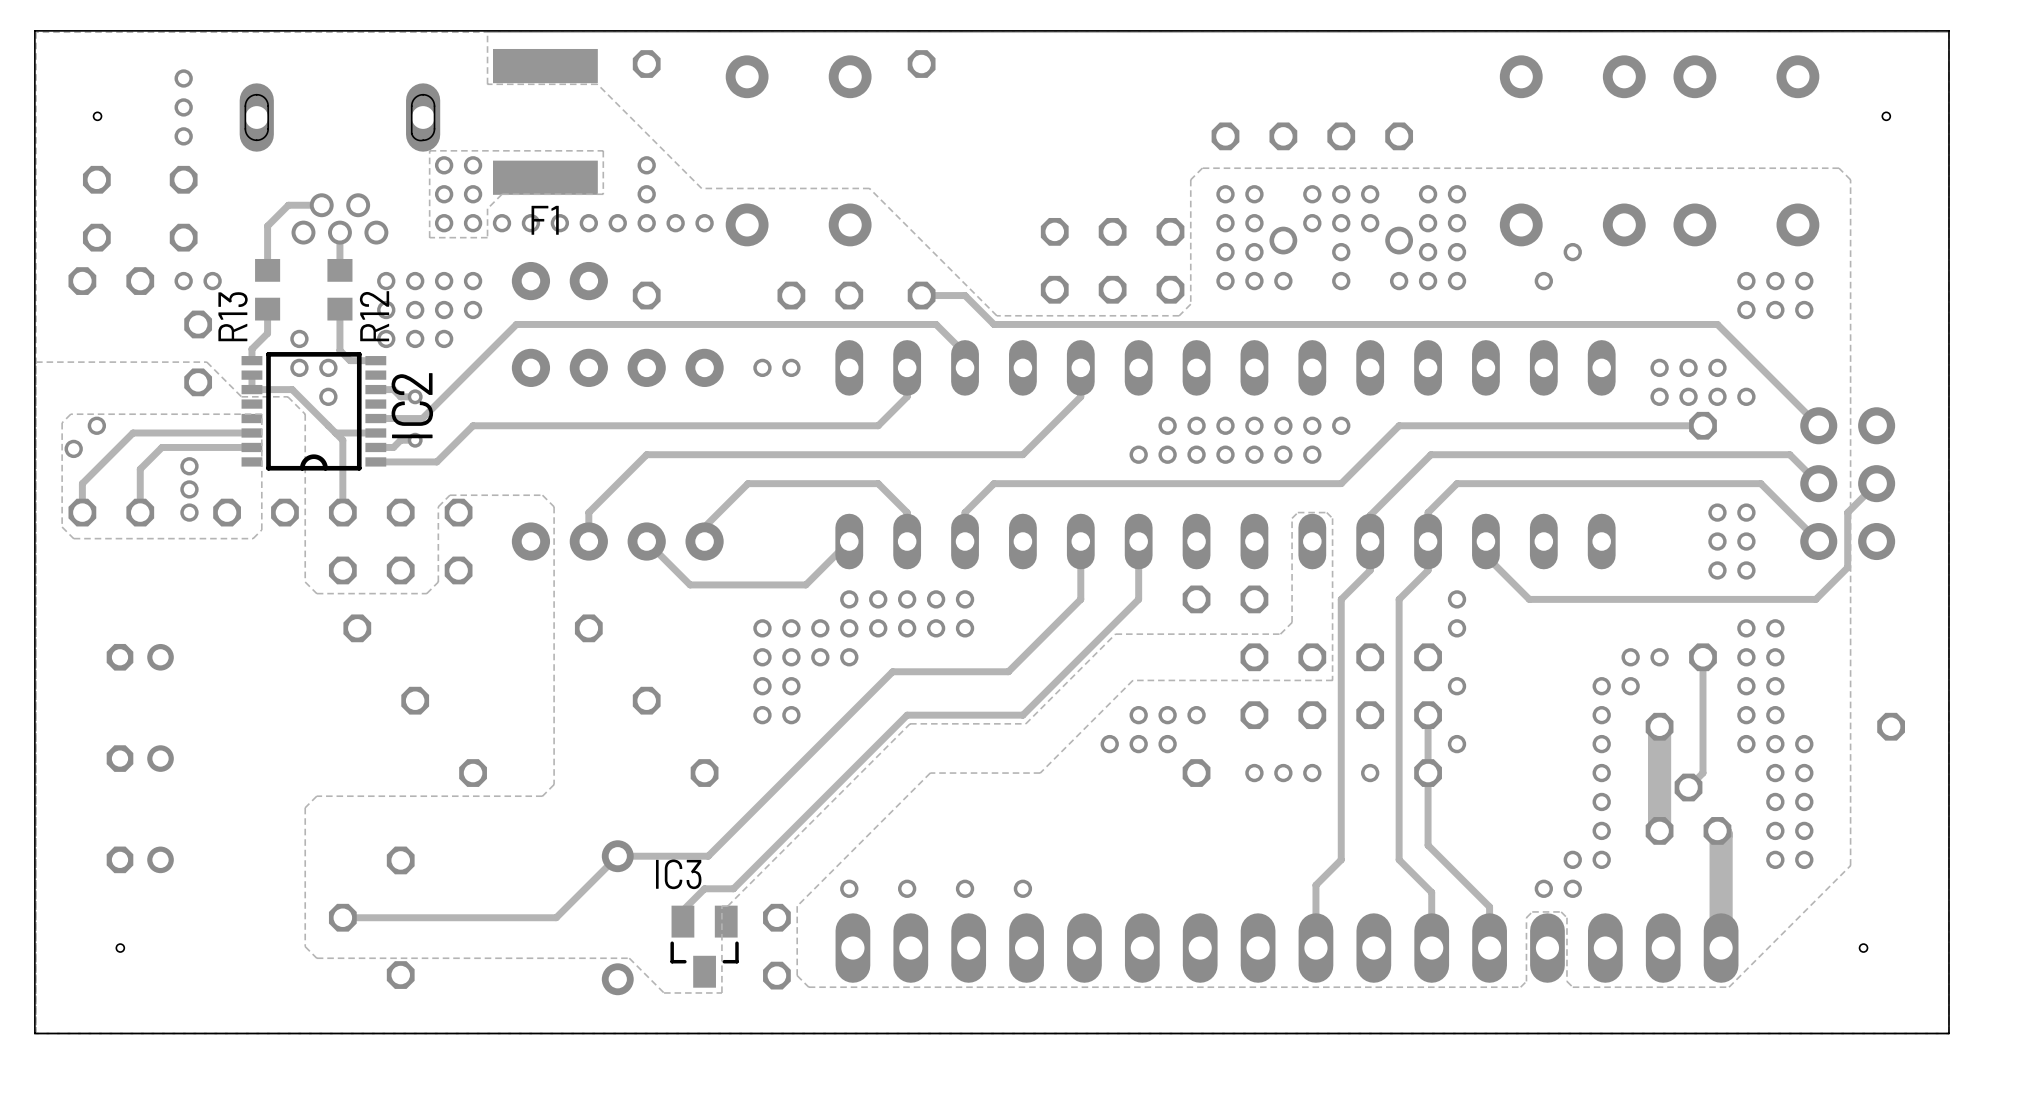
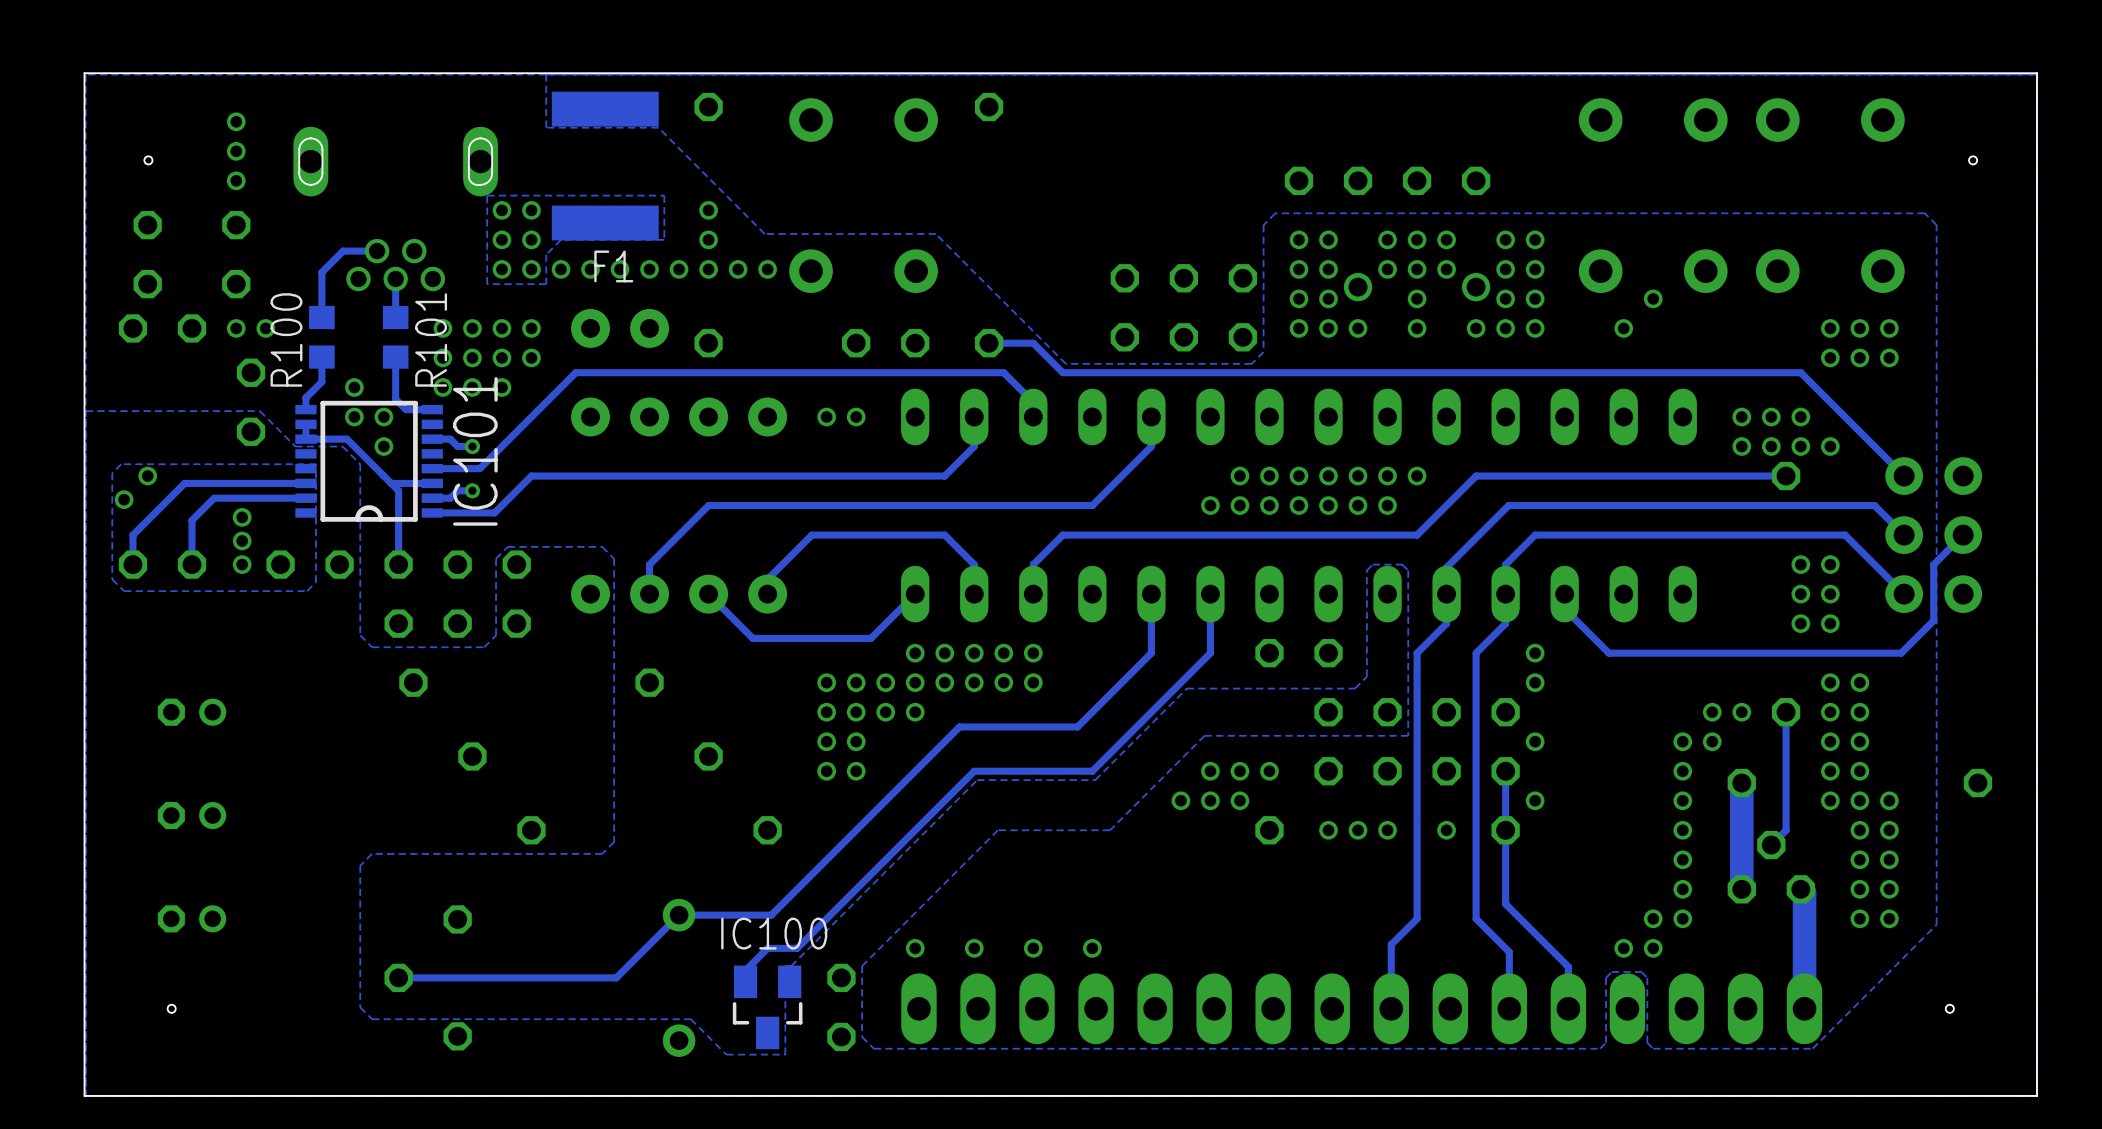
R13 name: R13 (233, 316) -> R100 (286, 339)
R12 name: R12 (374, 316) -> R101 (431, 339)
IC2 name: IC2 (412, 405) -> IC101 (475, 451)
IC3 name: IC3 (678, 874) -> IC100 (774, 933)

